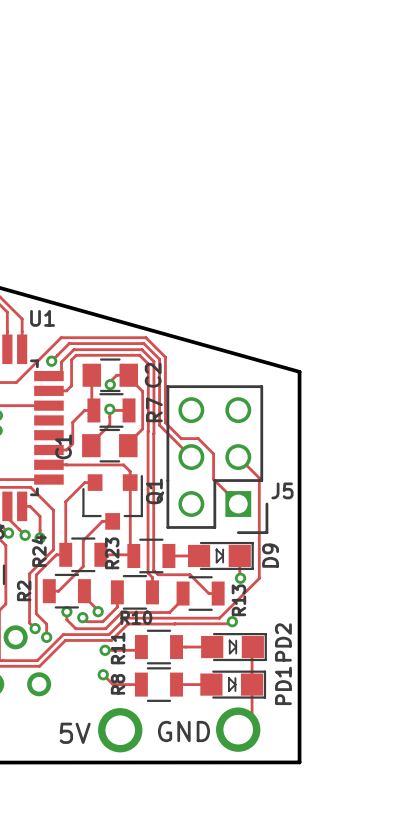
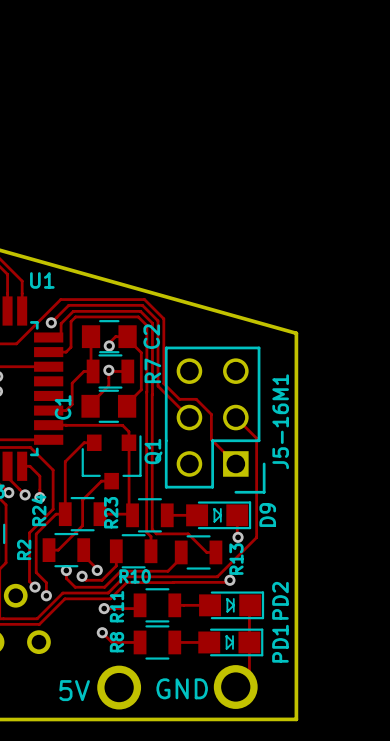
J5 name: J5 (282, 490) -> J5-16M1 (280, 421)

